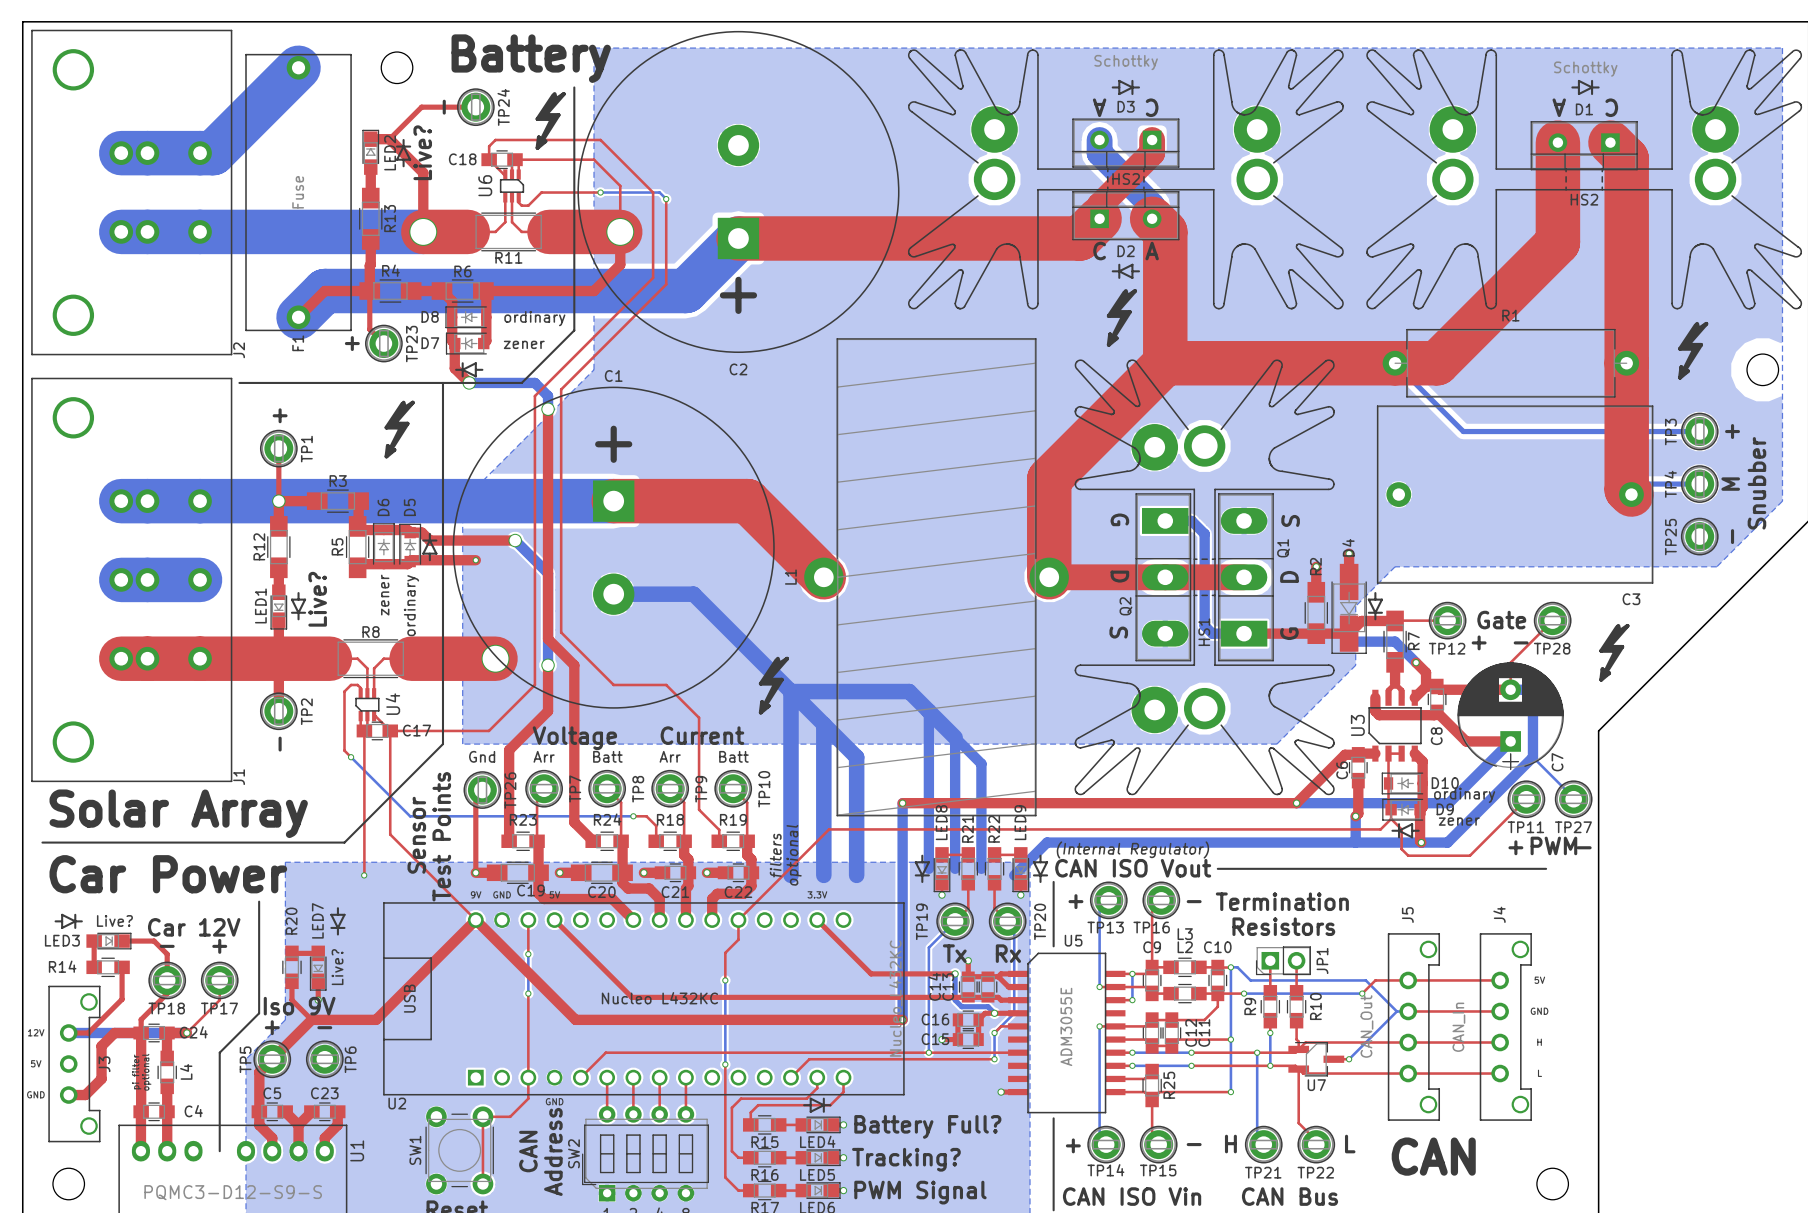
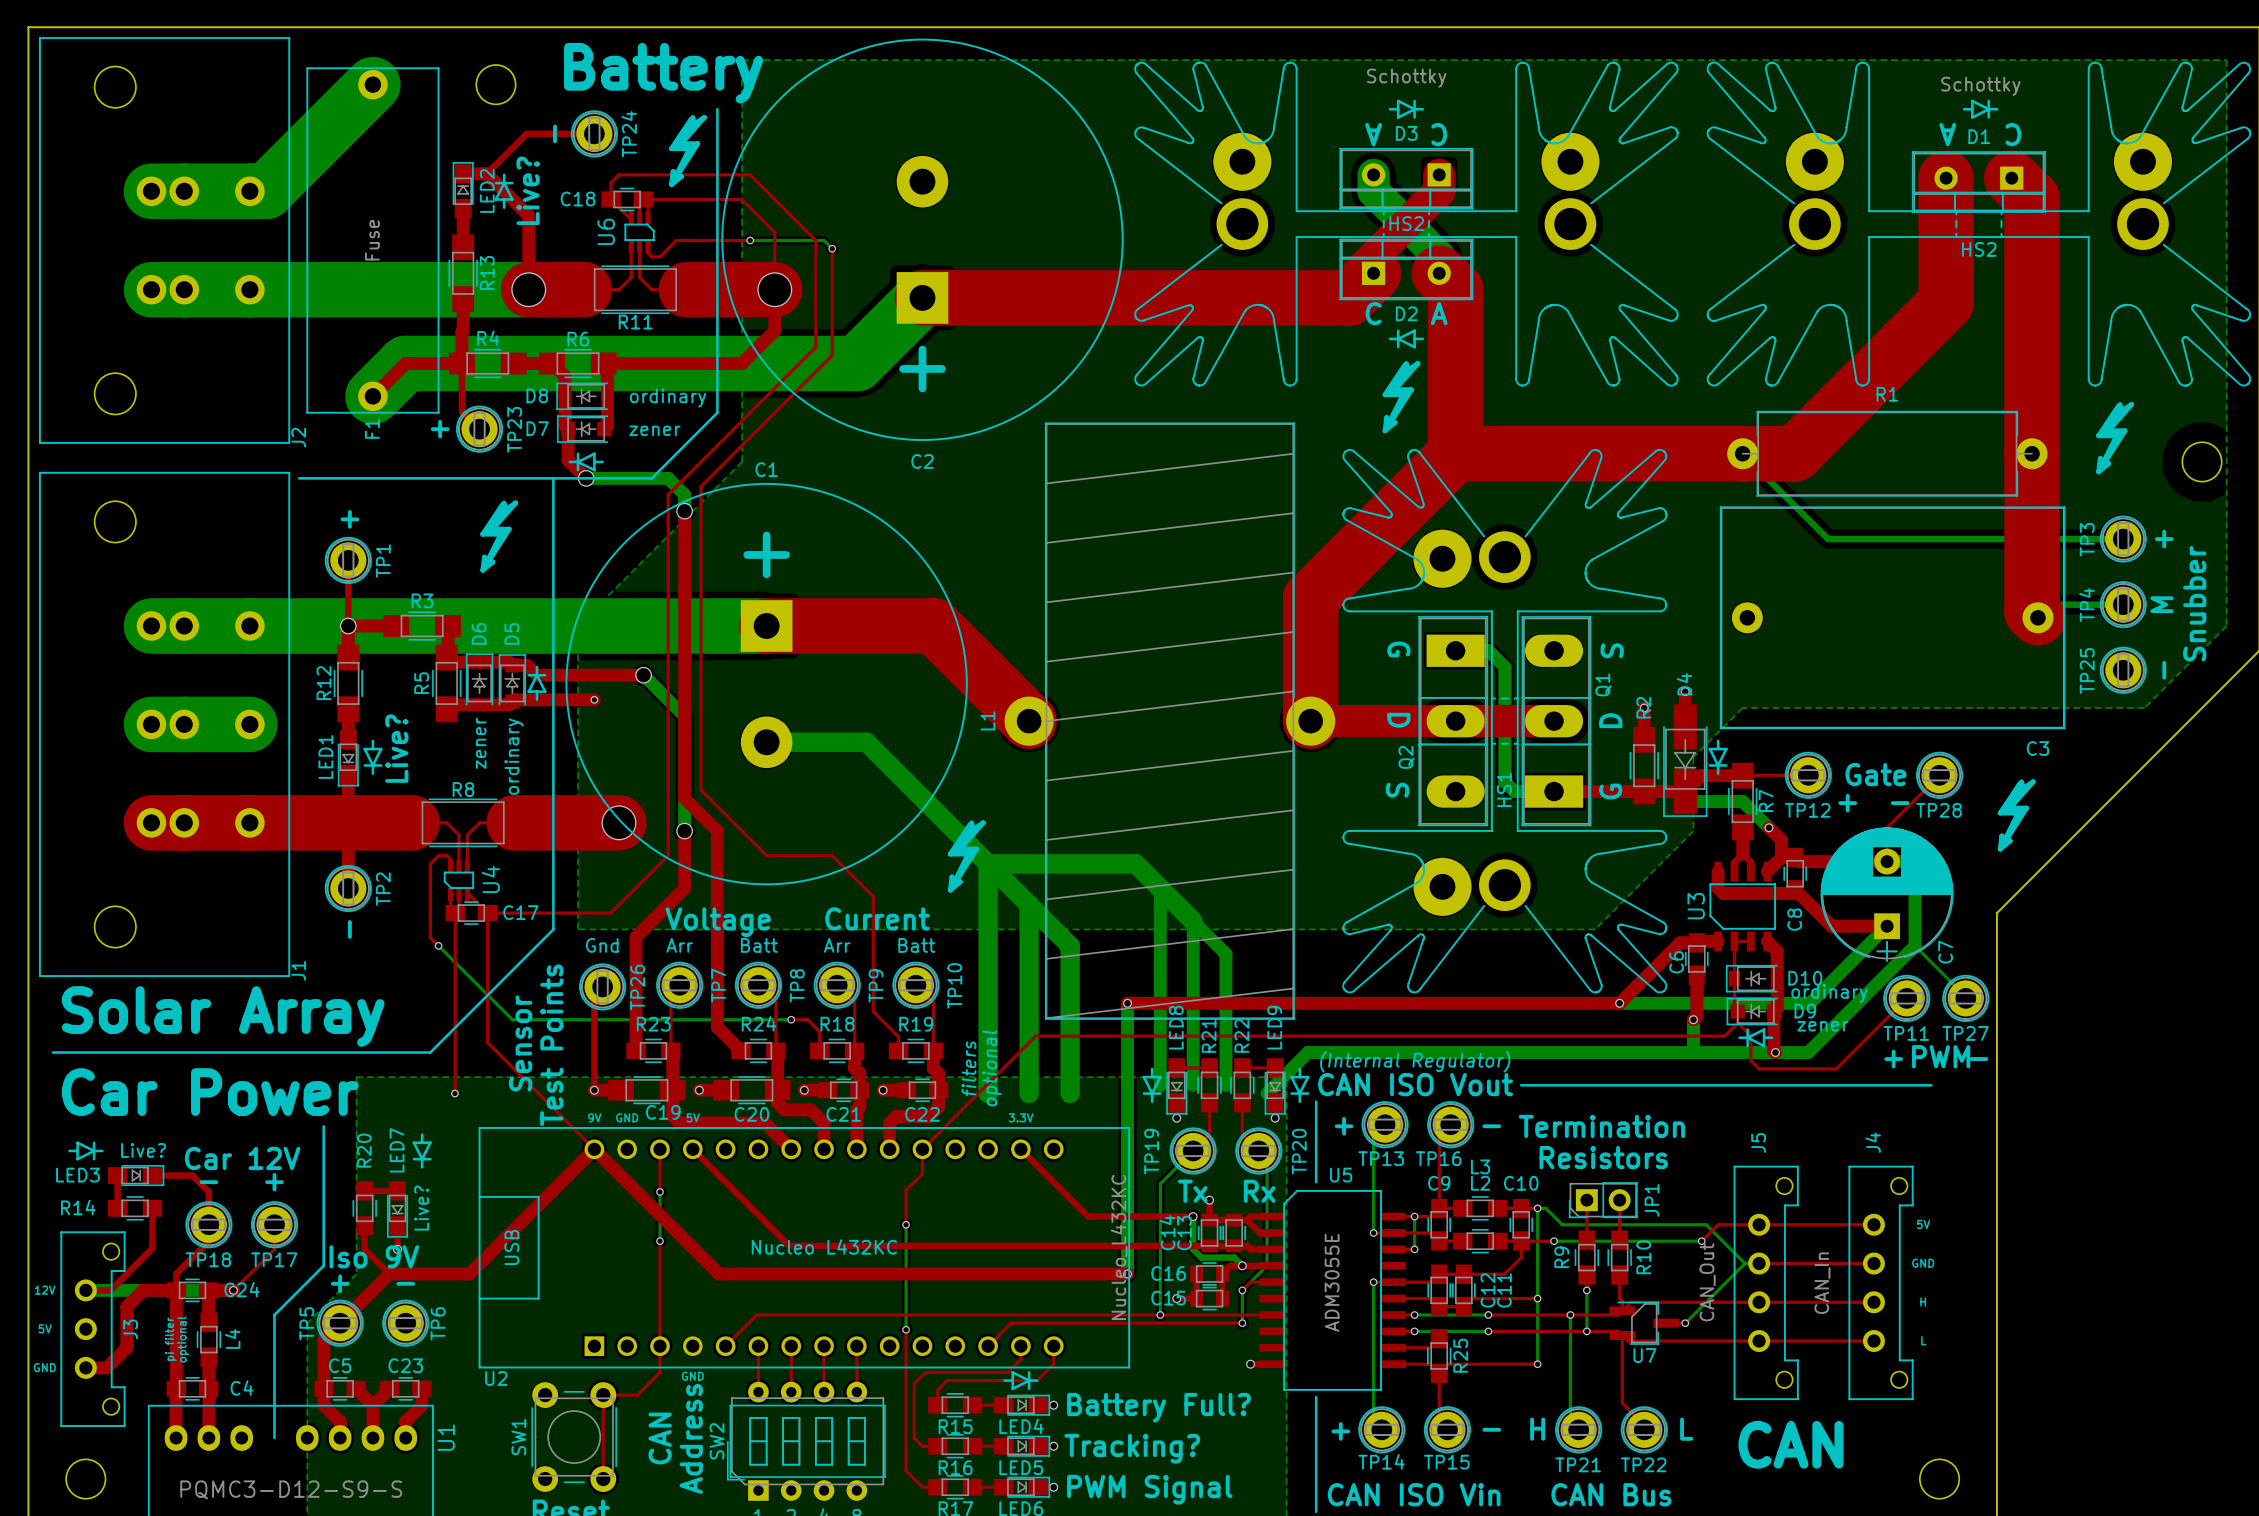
J2 footprint: [31, 29, 233, 356] -> [38, 37, 291, 444]
J1 footprint: [31, 377, 233, 783] -> [38, 471, 291, 978]
J5 footprint: [1387, 933, 1441, 1121] -> [1733, 1165, 1799, 1401]
J4 footprint: [1479, 933, 1532, 1121] -> [1848, 1165, 1914, 1401]
J3 footprint: [48, 985, 101, 1143] -> [60, 1231, 126, 1427]

